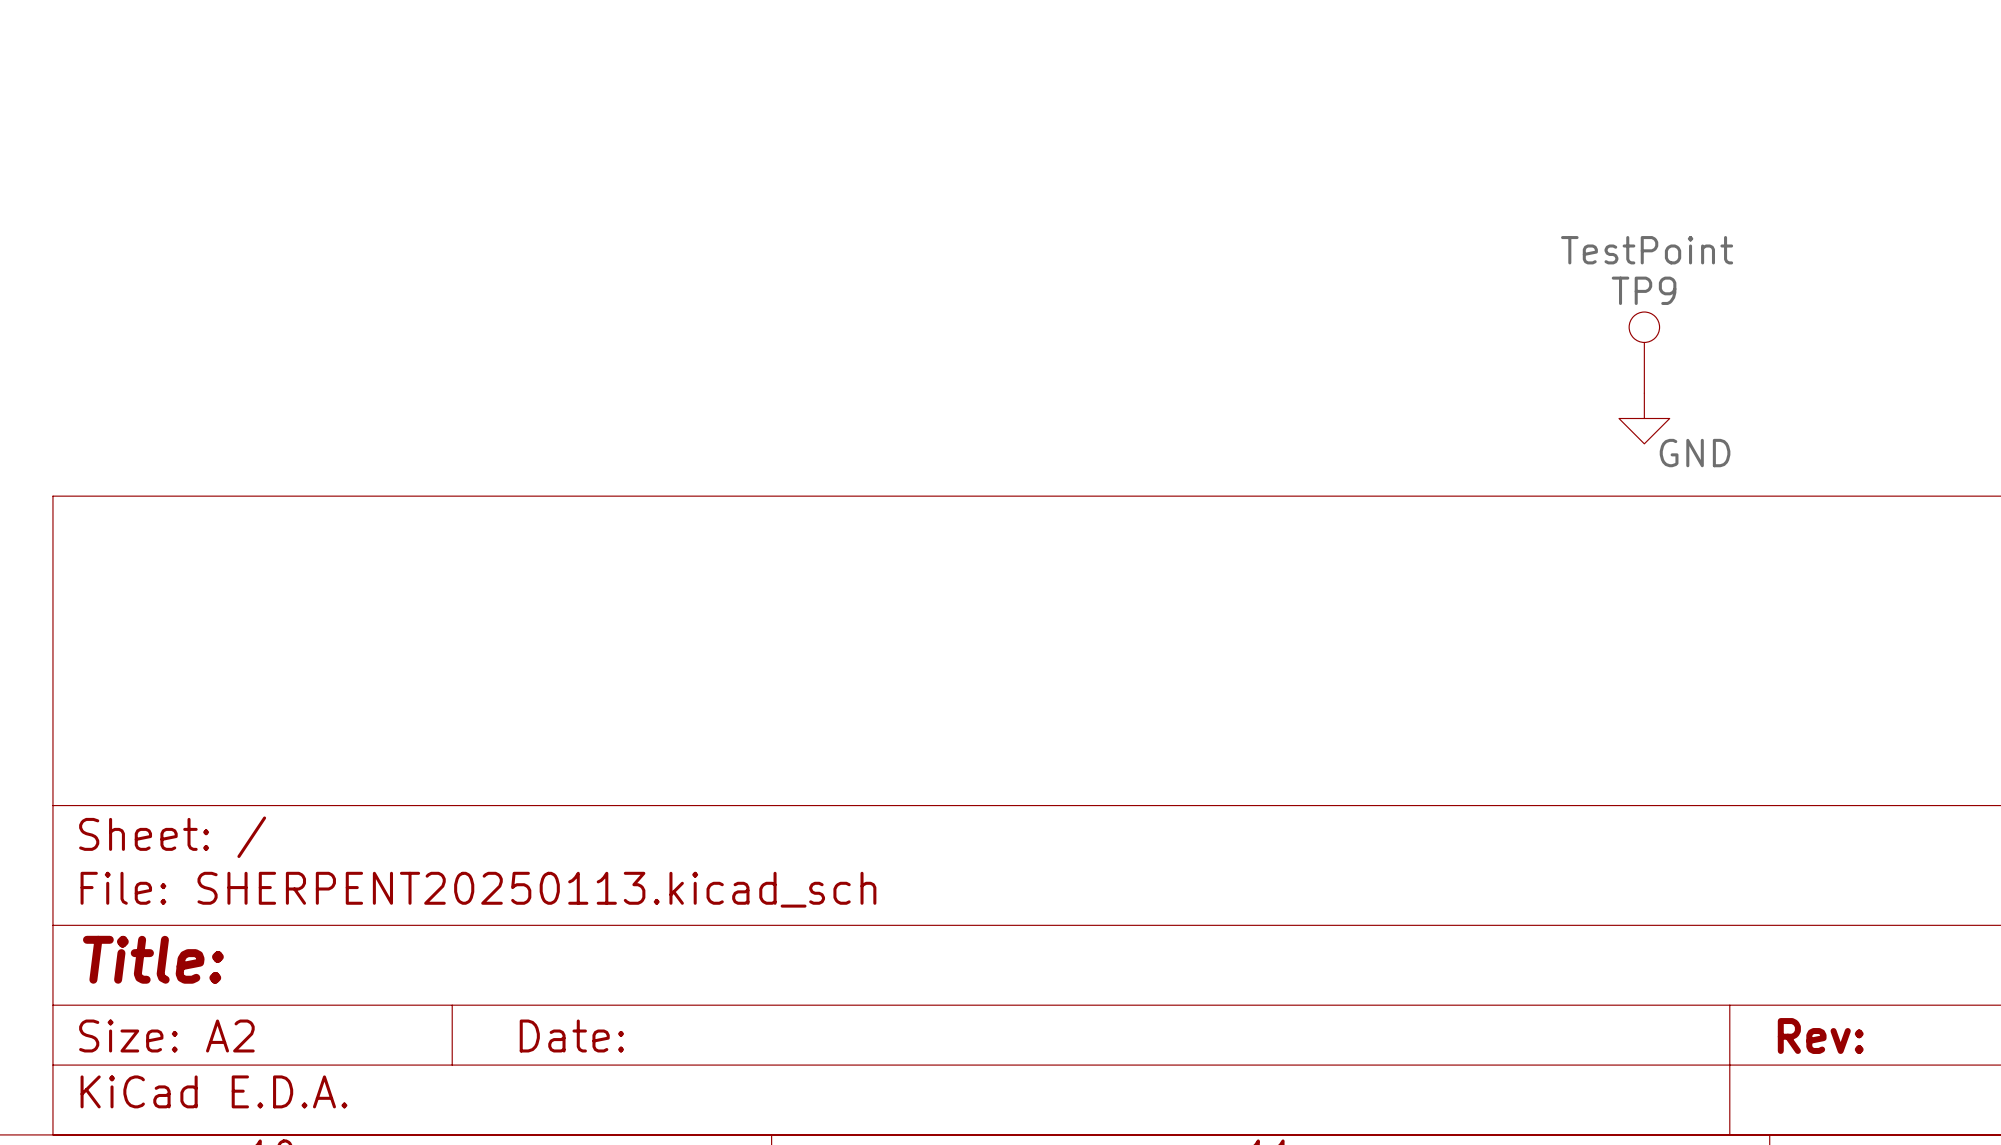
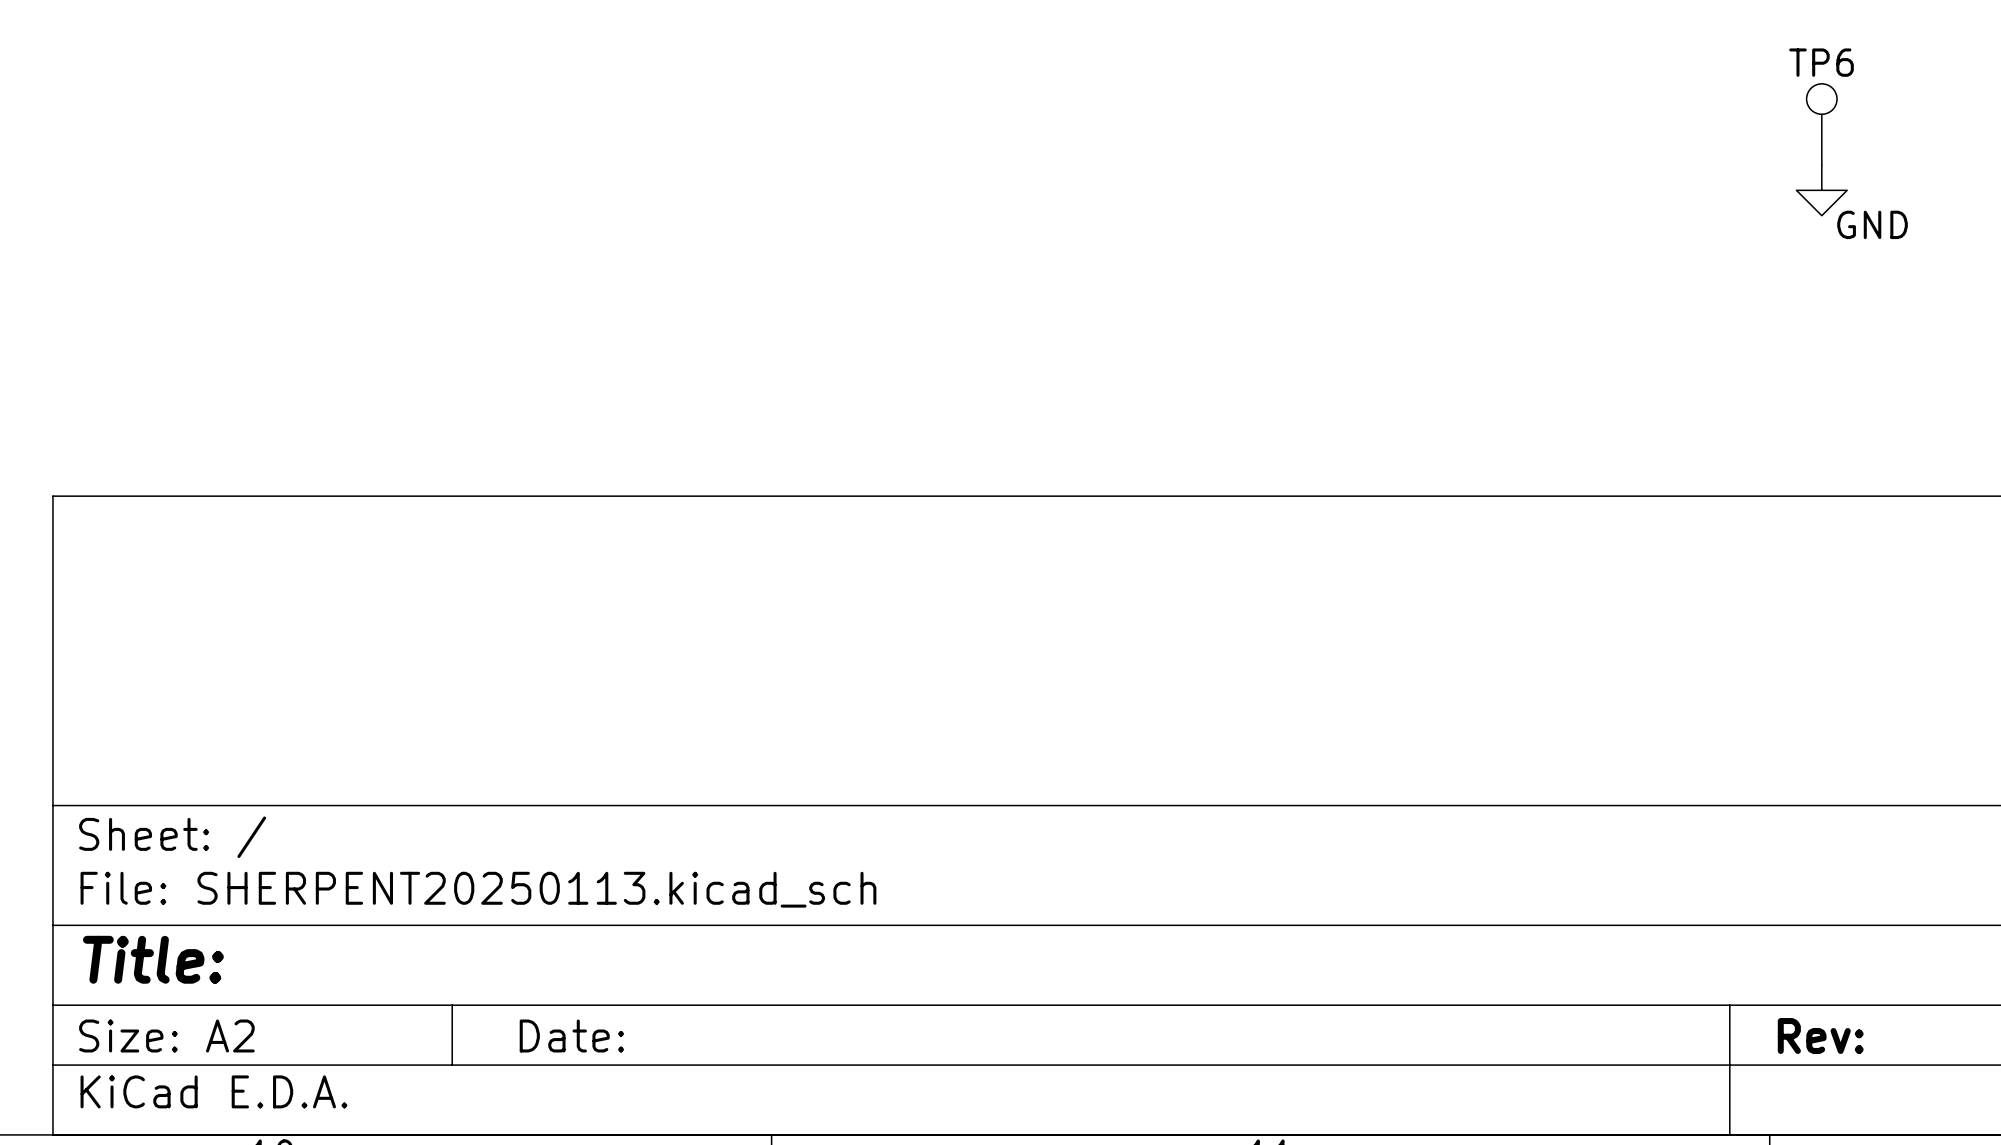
TP6: none -> (1821, 124)
TP9: TestPoint (1644, 352) -> none
power symbol position: GND (1644, 418) -> GND (1821, 190)

